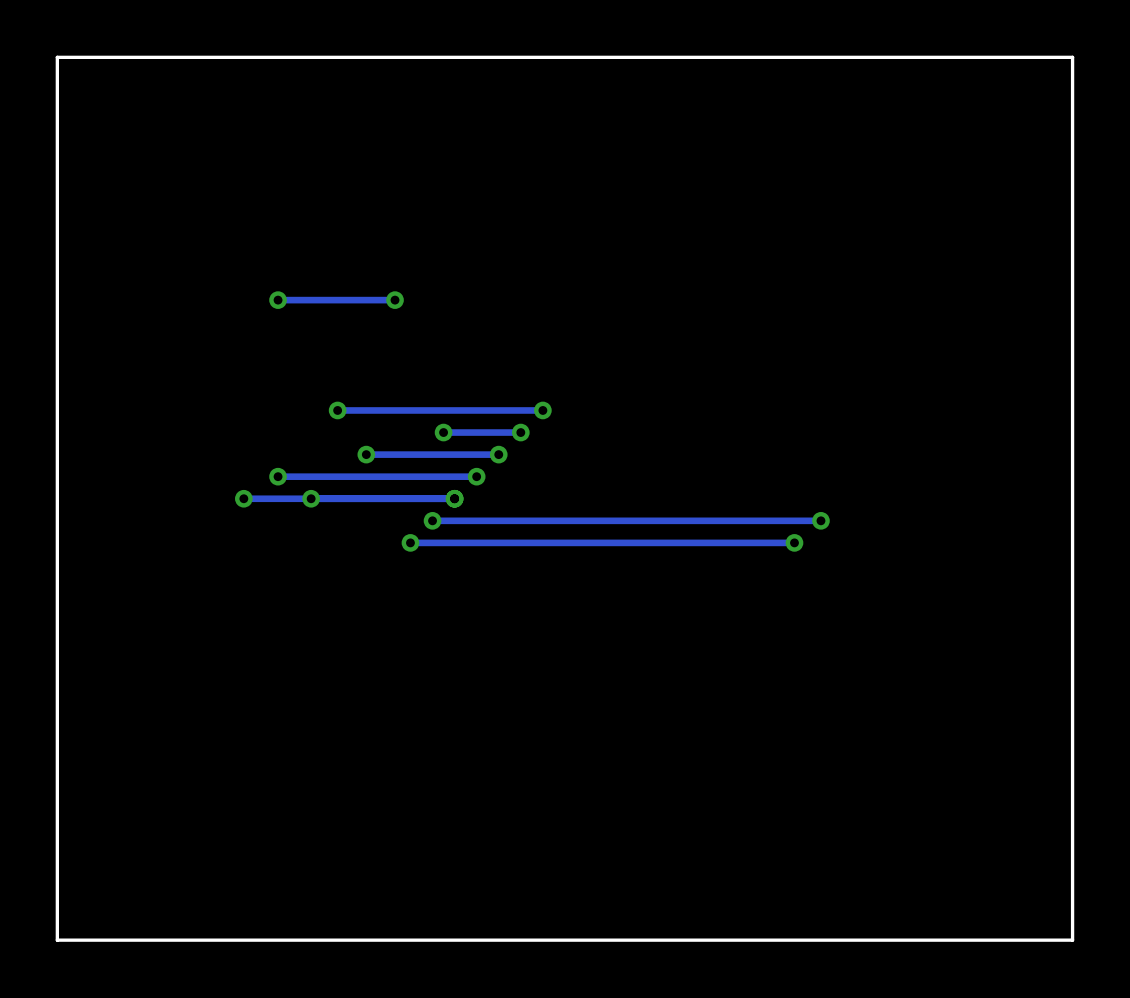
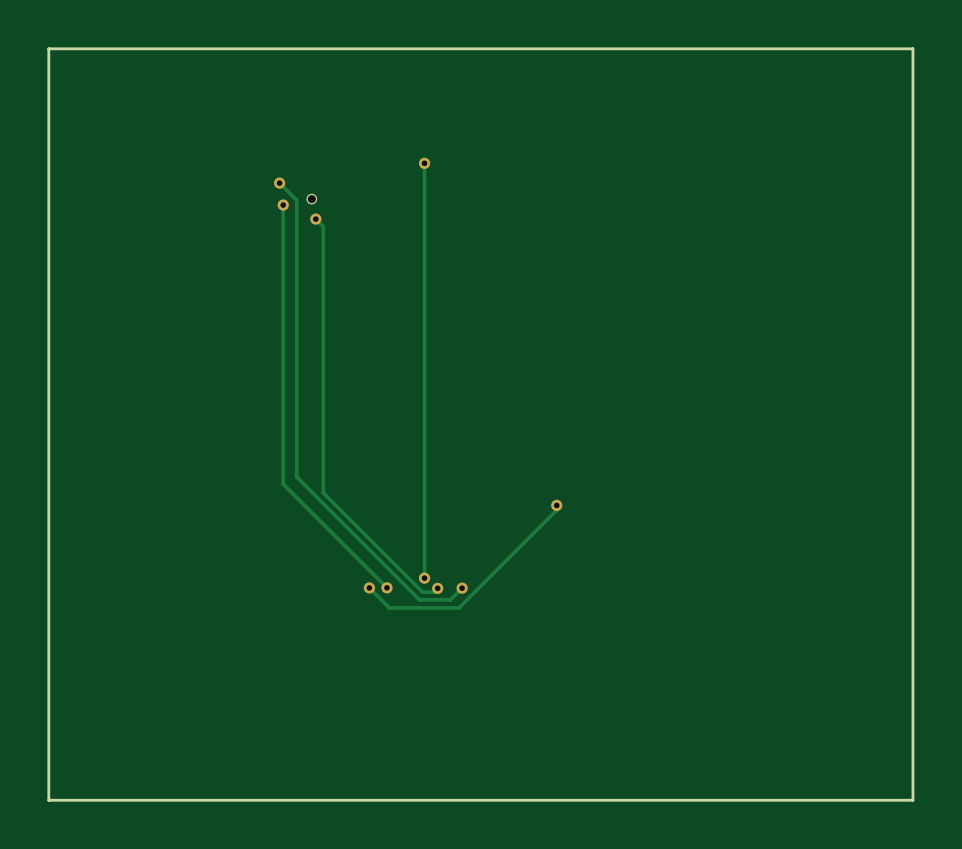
track: none -> (424, 163) (424, 578)
via: none -> (424, 163)
track: none -> (279, 183) (296, 200) (296, 477) (419, 599) (450, 599) (462, 588)
via: none -> (279, 183)
part: none -> (311, 199)
track: none -> (283, 205) (283, 484) (386, 587)
via: none -> (283, 205)
track: none -> (315, 219) (323, 226) (323, 492) (422, 592) (433, 592) (437, 588)
via: none -> (315, 219)
via: (278, 300) -> none
track: (395, 300) (278, 300) -> none
via: (395, 300) -> none
via: (337, 410) -> none
track: (542, 410) (337, 410) -> none
via: (542, 410) -> none
via: (443, 432) -> none
track: (520, 432) (443, 432) -> none
via: (520, 432) -> none
via: (366, 454) -> none
track: (498, 454) (366, 454) -> none
via: (498, 454) -> none
via: (278, 476) -> none
track: (476, 476) (278, 476) -> none
via: (476, 476) -> none
via: (243, 498) -> none
via: (311, 498) -> none
track: (454, 498) (243, 498) -> none
via: (454, 498) -> none
via: (432, 520) -> none
track: (820, 520) (432, 520) -> none
via: (820, 520) -> none
via: (410, 542) -> none
track: (794, 542) (410, 542) -> none
via: (794, 542) -> none
track: none -> (556, 505) (556, 510) (459, 607) (389, 607) (369, 587)
via: none -> (556, 505)
via: none -> (424, 578)
via: none -> (369, 587)
via: none -> (386, 587)
via: none -> (462, 588)
via: none -> (437, 588)

